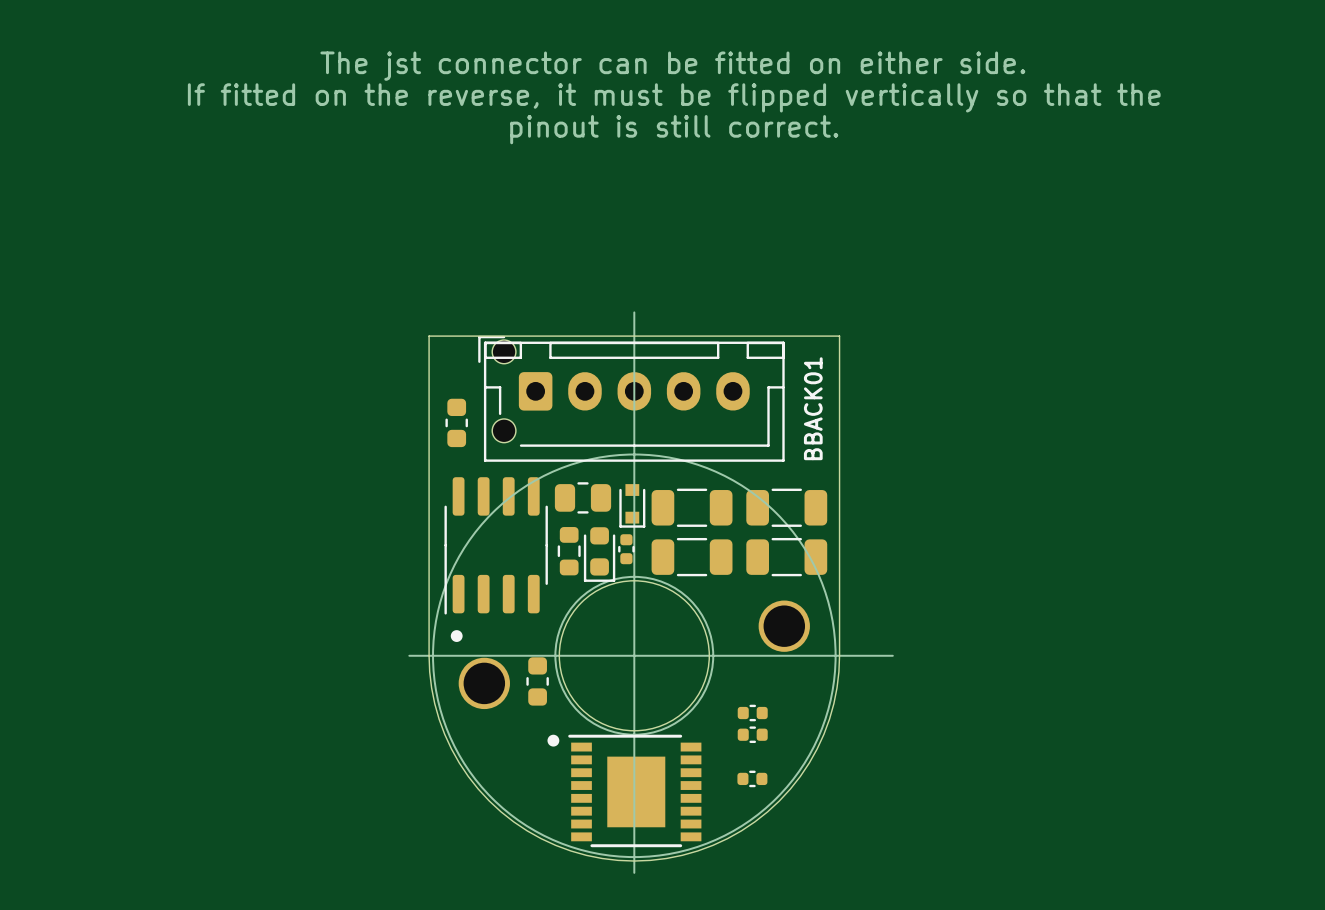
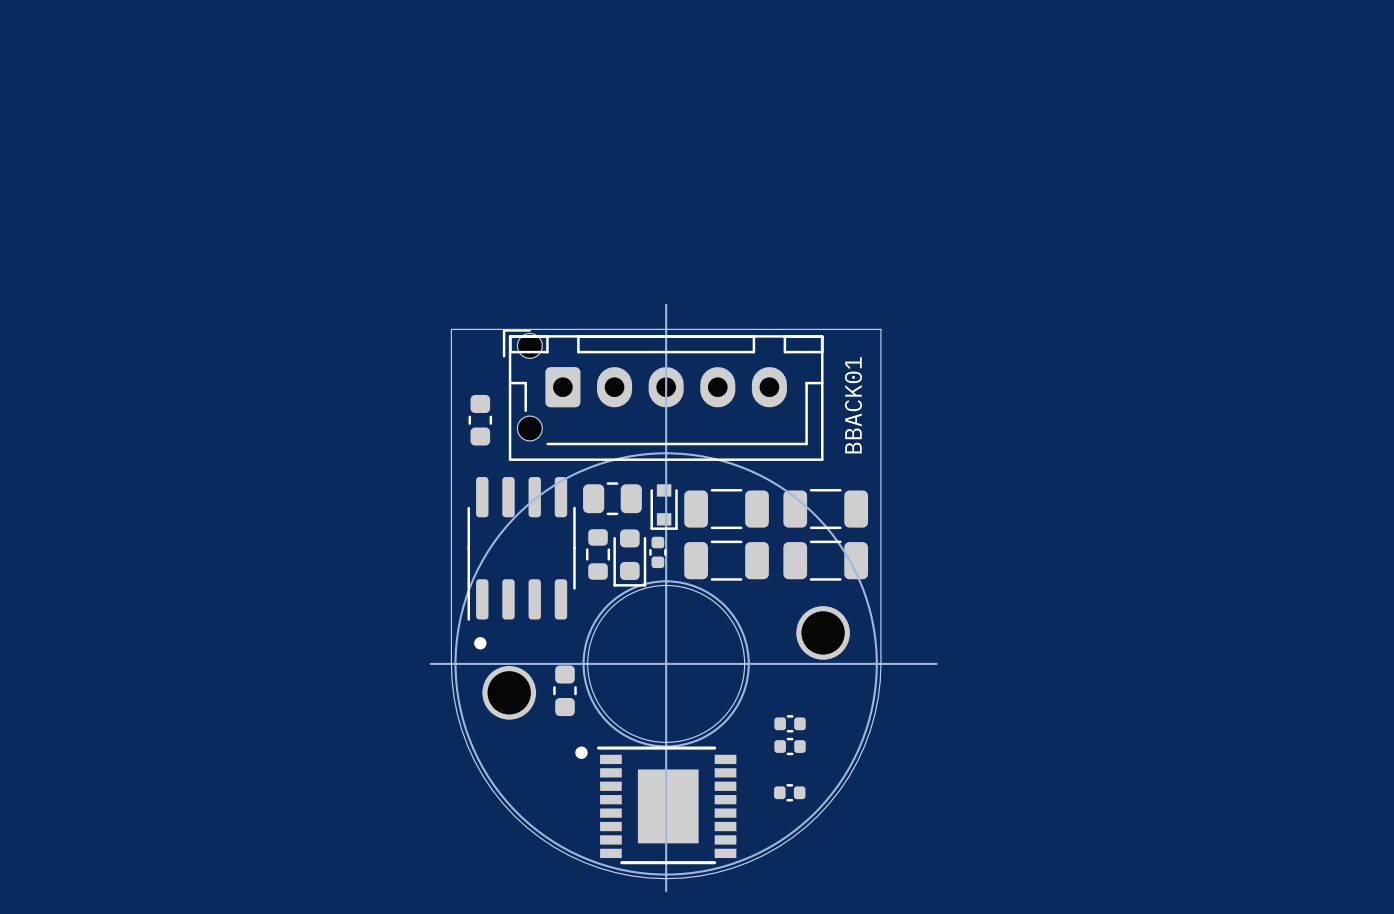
text: The jst connector can be fitted on either side. (672, 66) -> none
text: If fitted on the reverse, it must be flipped vertically so that the (674, 97) -> none
text: pinout is still correct. (674, 129) -> none

